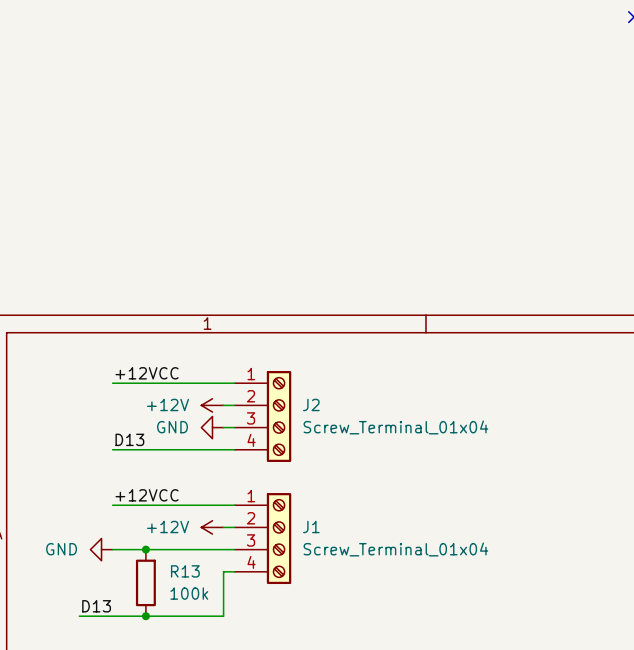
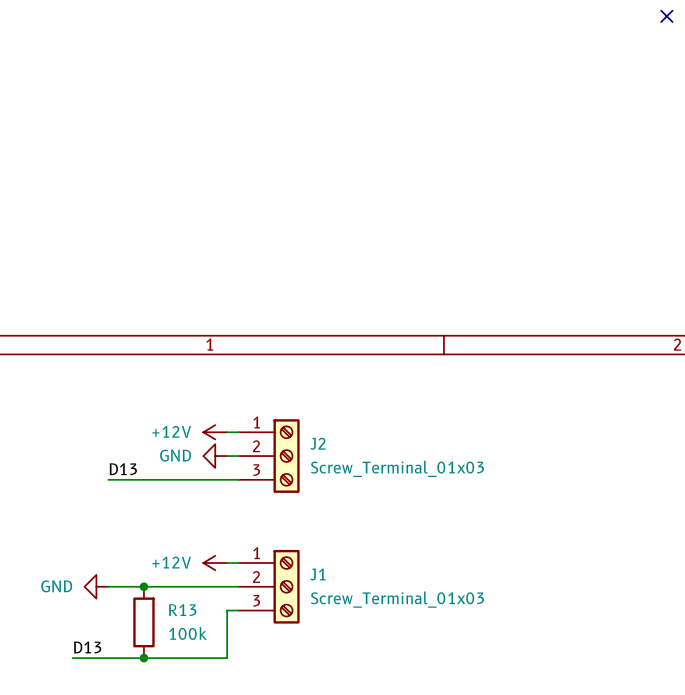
J2 symbol: [234, 371, 292, 462] -> [239, 419, 300, 493]
label: +12VCC (147, 373) -> none
wire: (112, 383) (234, 383) -> none
J2 value: Screw_Terminal_01x04 (395, 427) -> Screw_Terminal_01x03 (397, 468)
J1 symbol: [234, 493, 292, 585] -> [239, 549, 300, 624]
label: +12VCC (147, 495) -> none
wire: (112, 505) (234, 505) -> none
J1 value: Screw_Terminal_01x04 (395, 549) -> Screw_Terminal_01x03 (397, 599)

